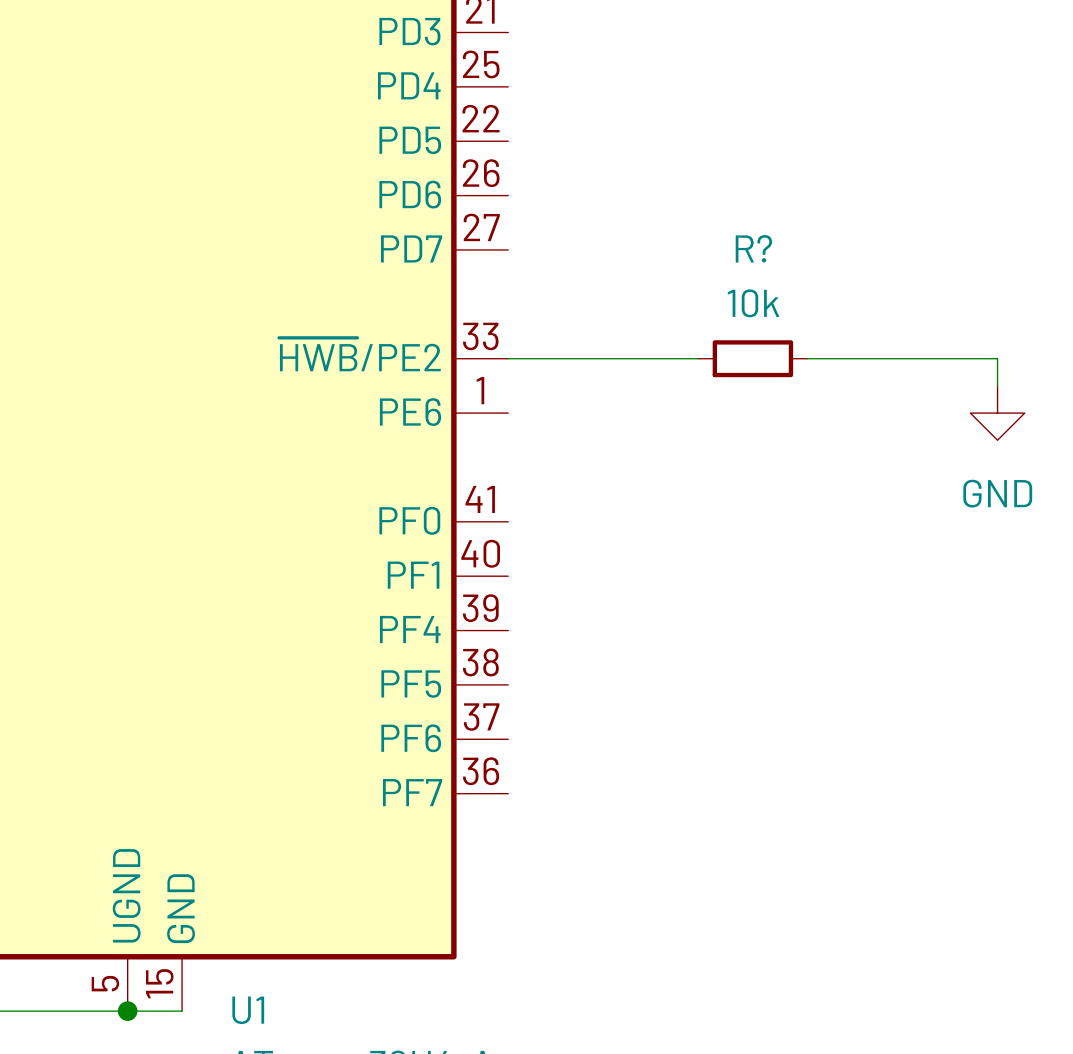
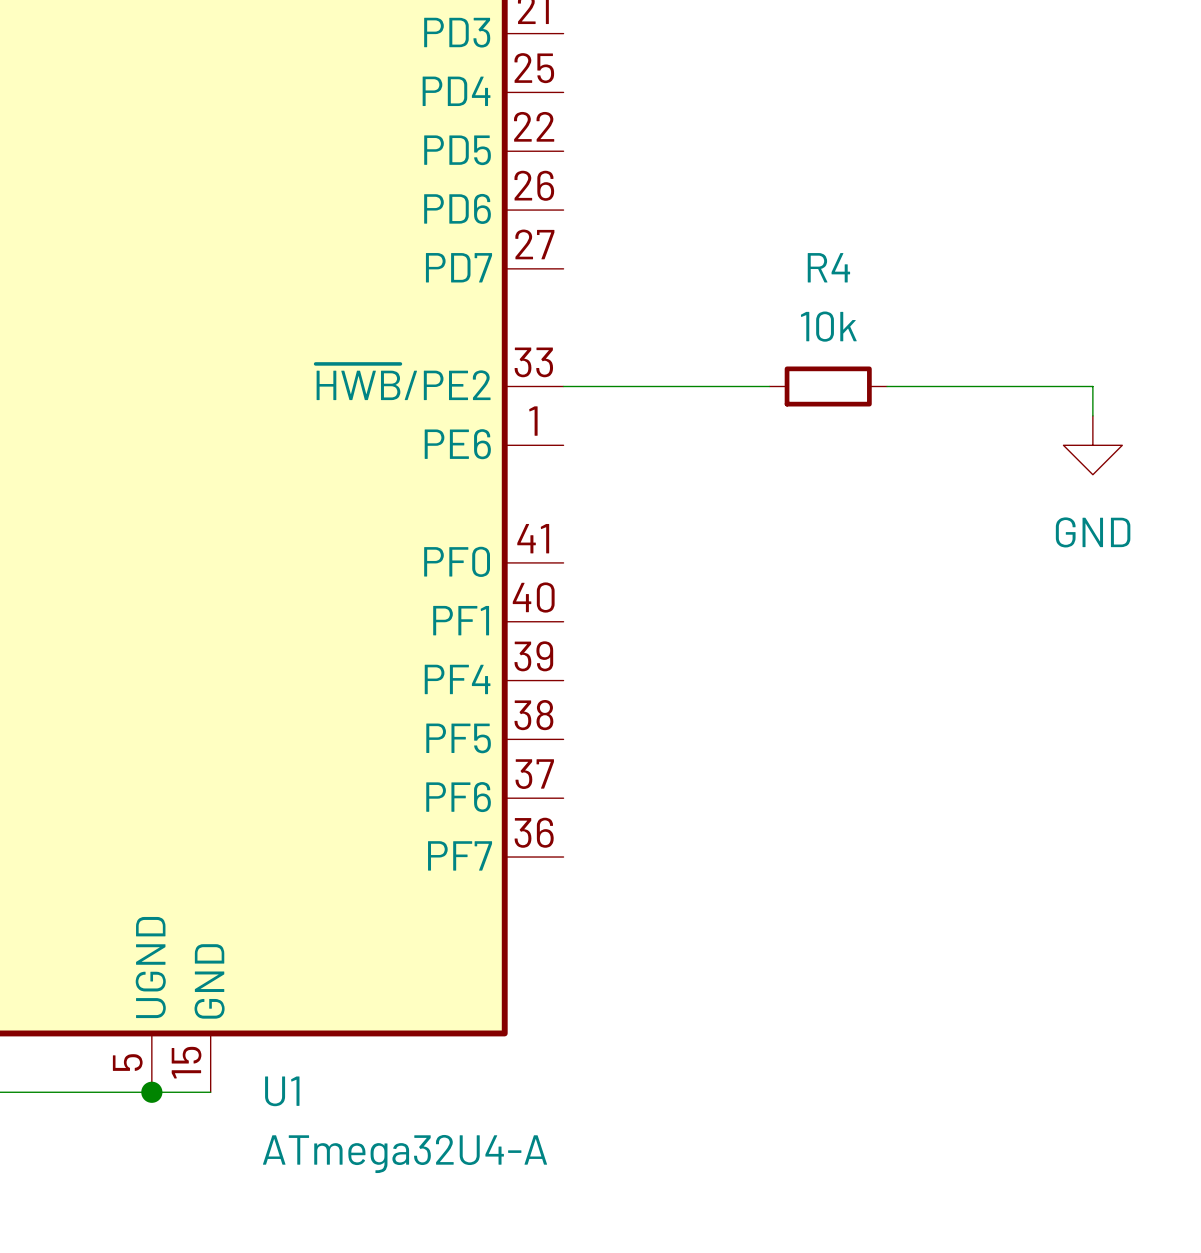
R? name: R? (753, 248) -> R4 (828, 267)

